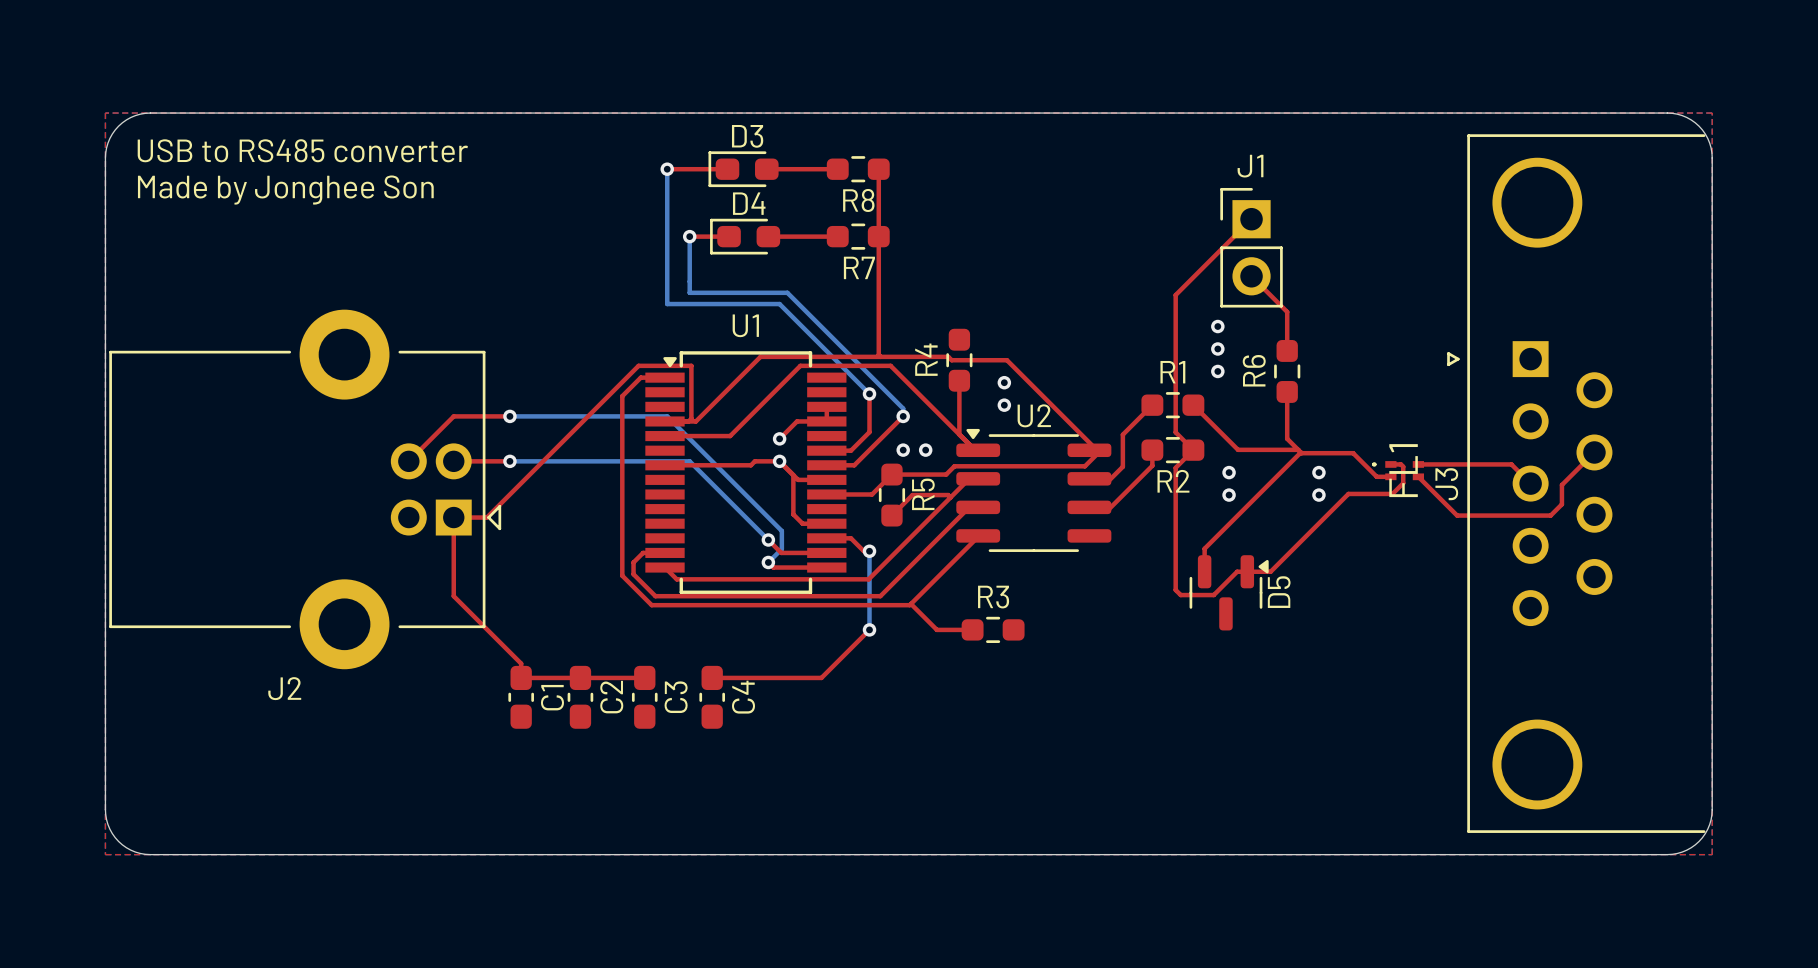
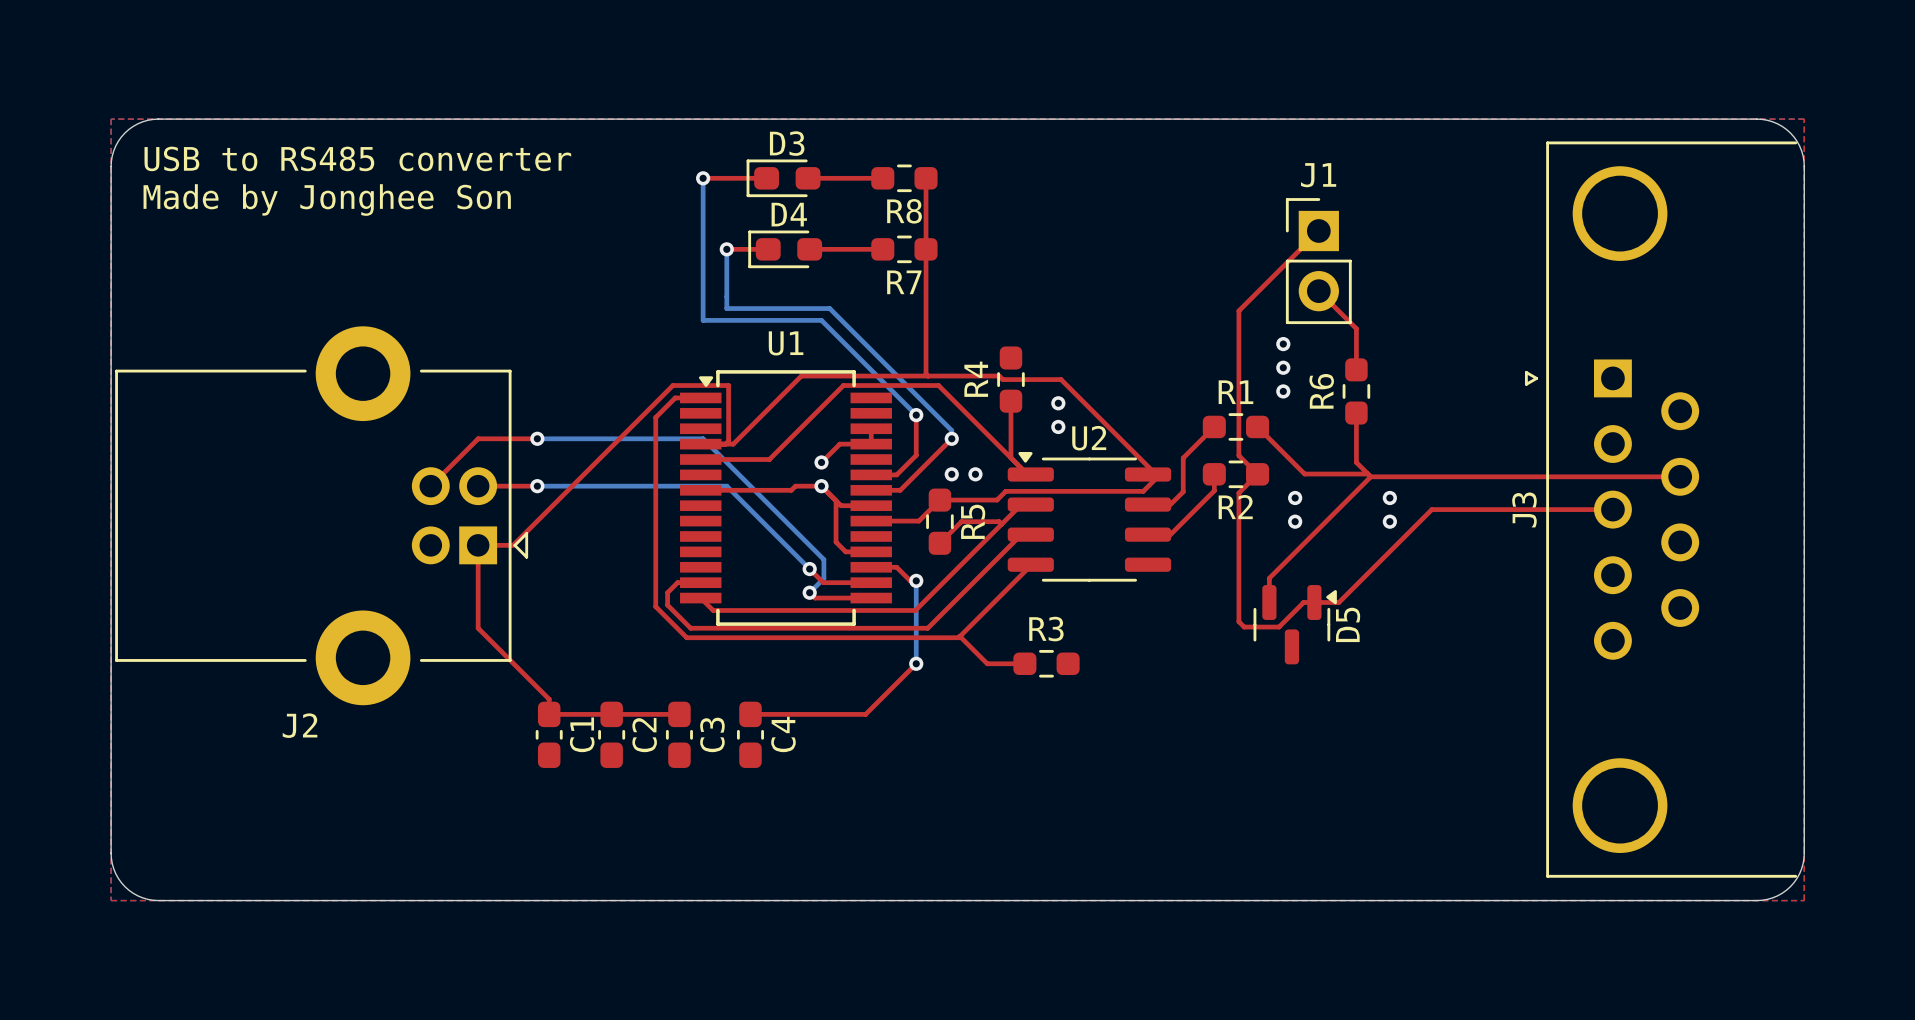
top track: (1300, 452) (1353, 453) (1376, 476) (1390, 476) -> none
top track: (1594, 452) (1561, 485) (1561, 504) (1550, 515) (1457, 515) (1418, 476) -> (1680, 476) (1370, 476)
top track: (1390, 464) (1400, 464) (1403, 466) (1403, 483) (1392, 493) (1348, 493) -> none
top track: (1418, 464) (1511, 464) (1530, 483) -> (1420, 520) (1431, 509) (1612, 509)
FL1: (1398, 470) -> none

